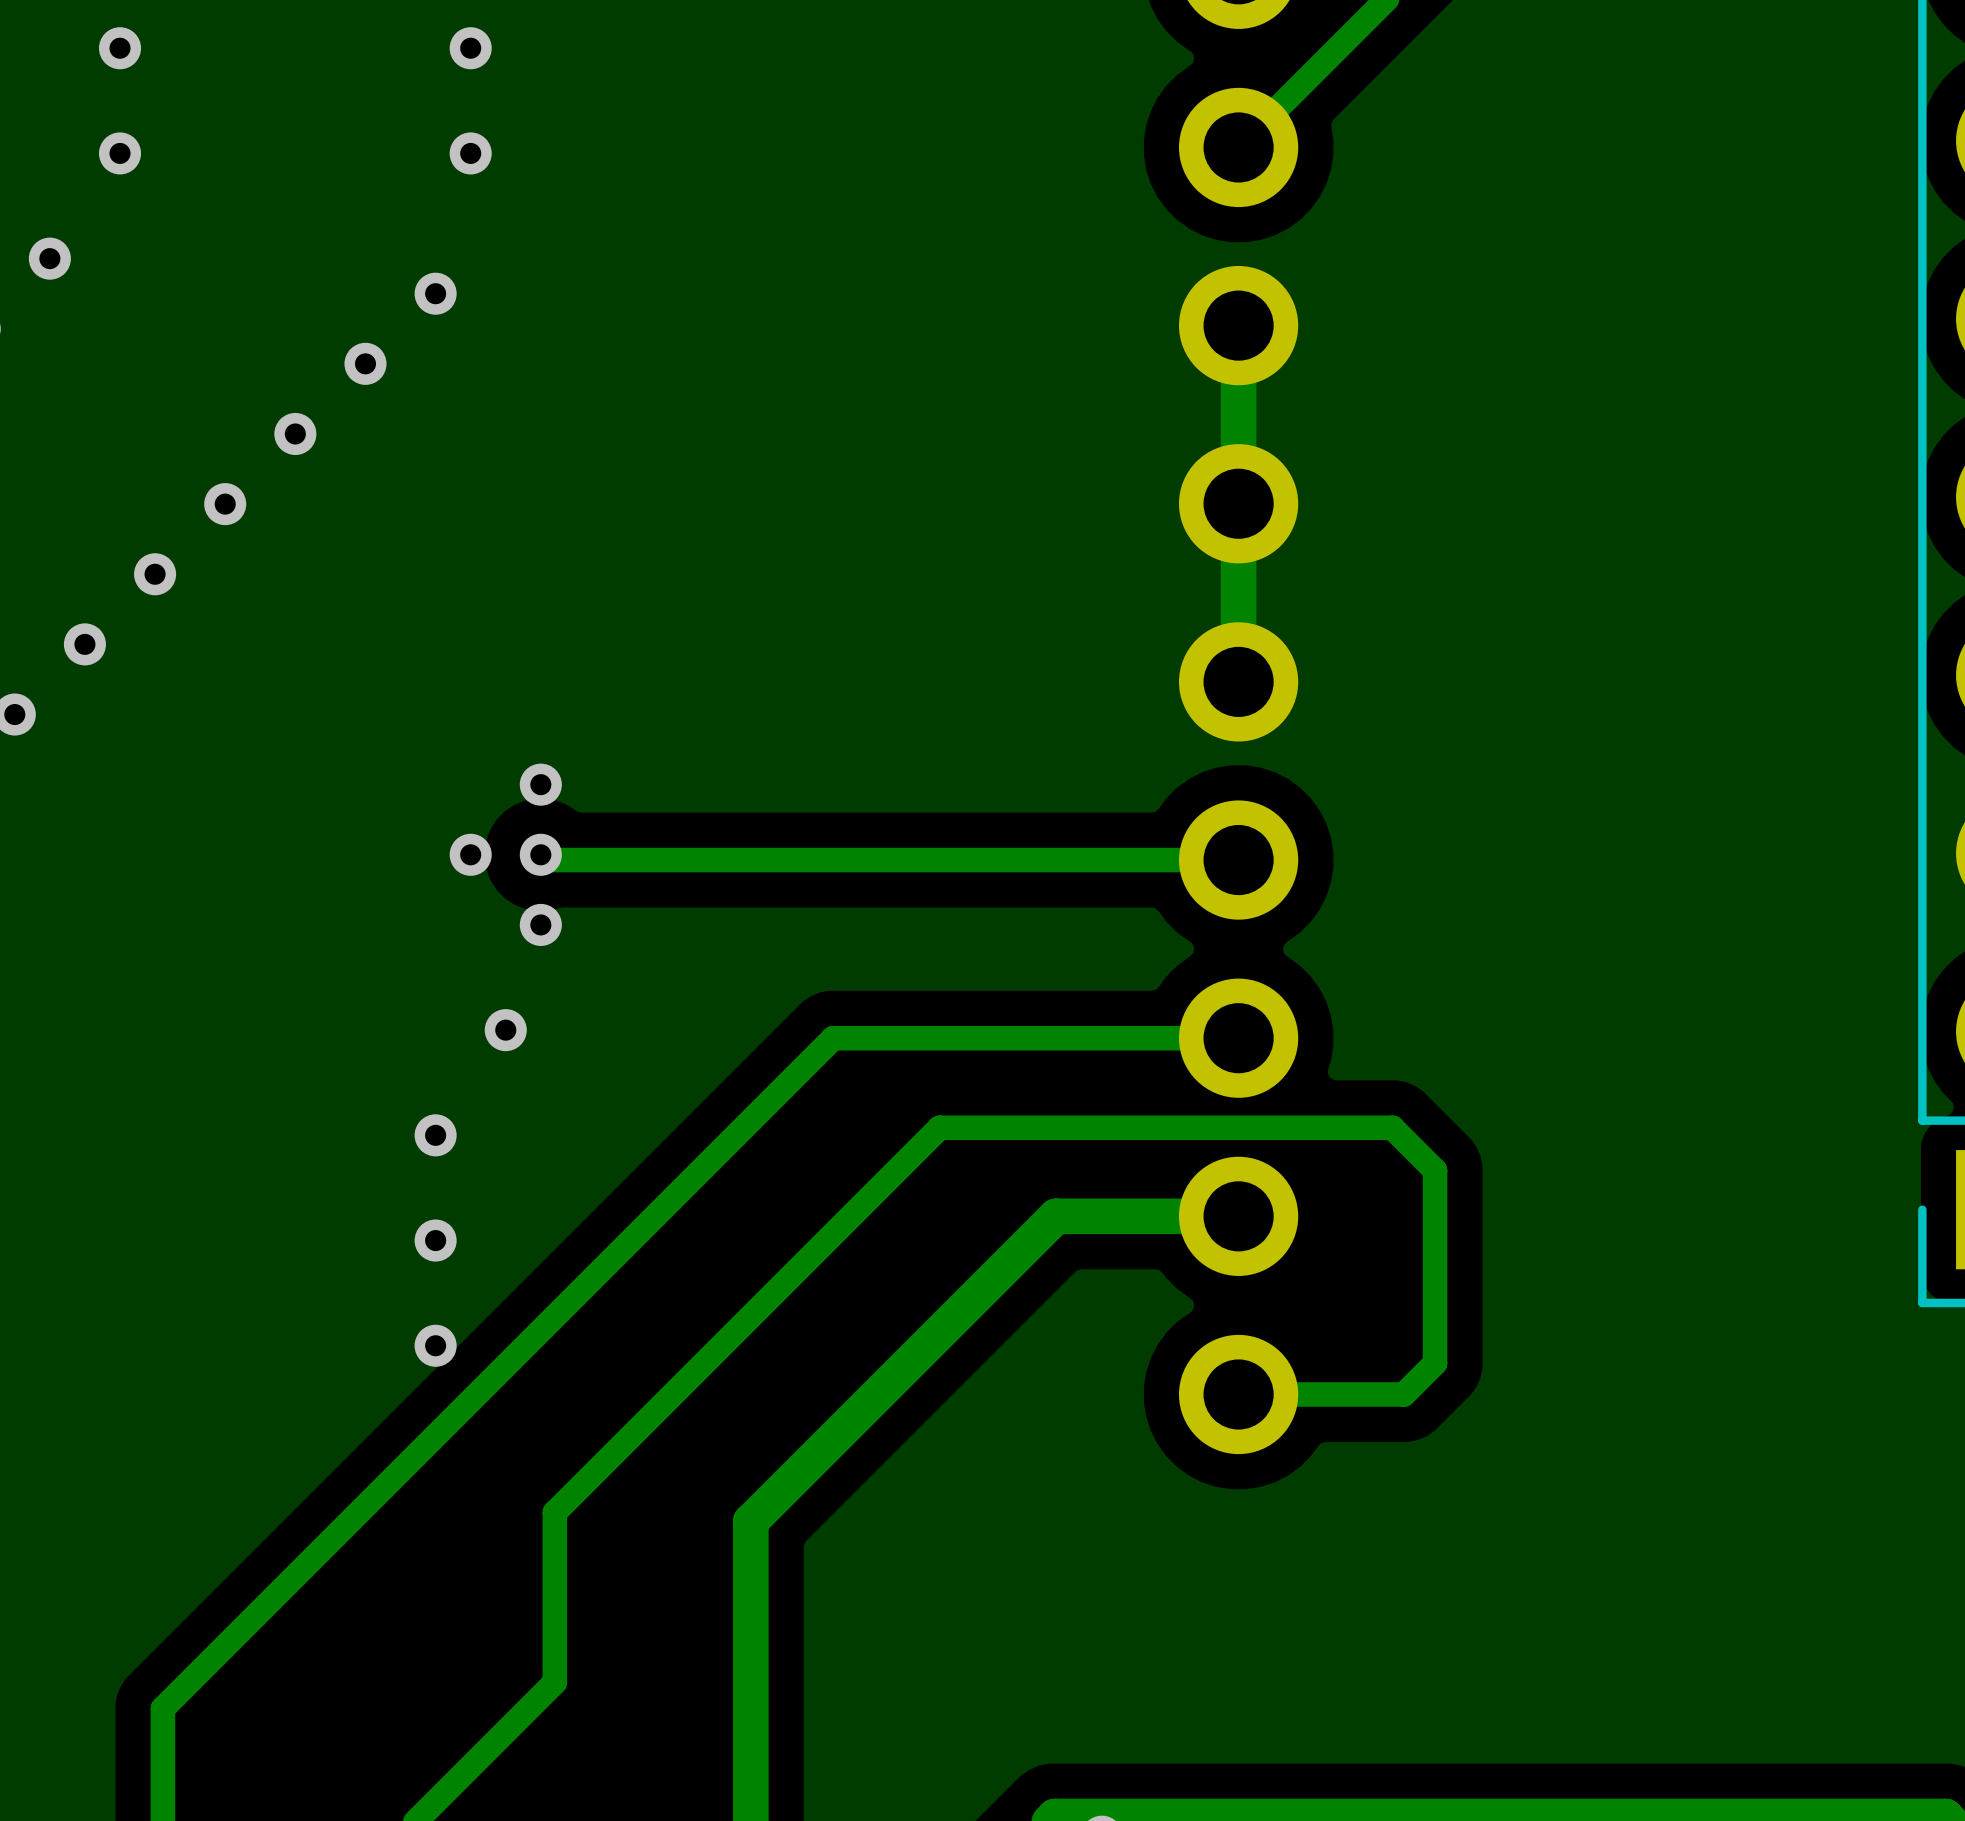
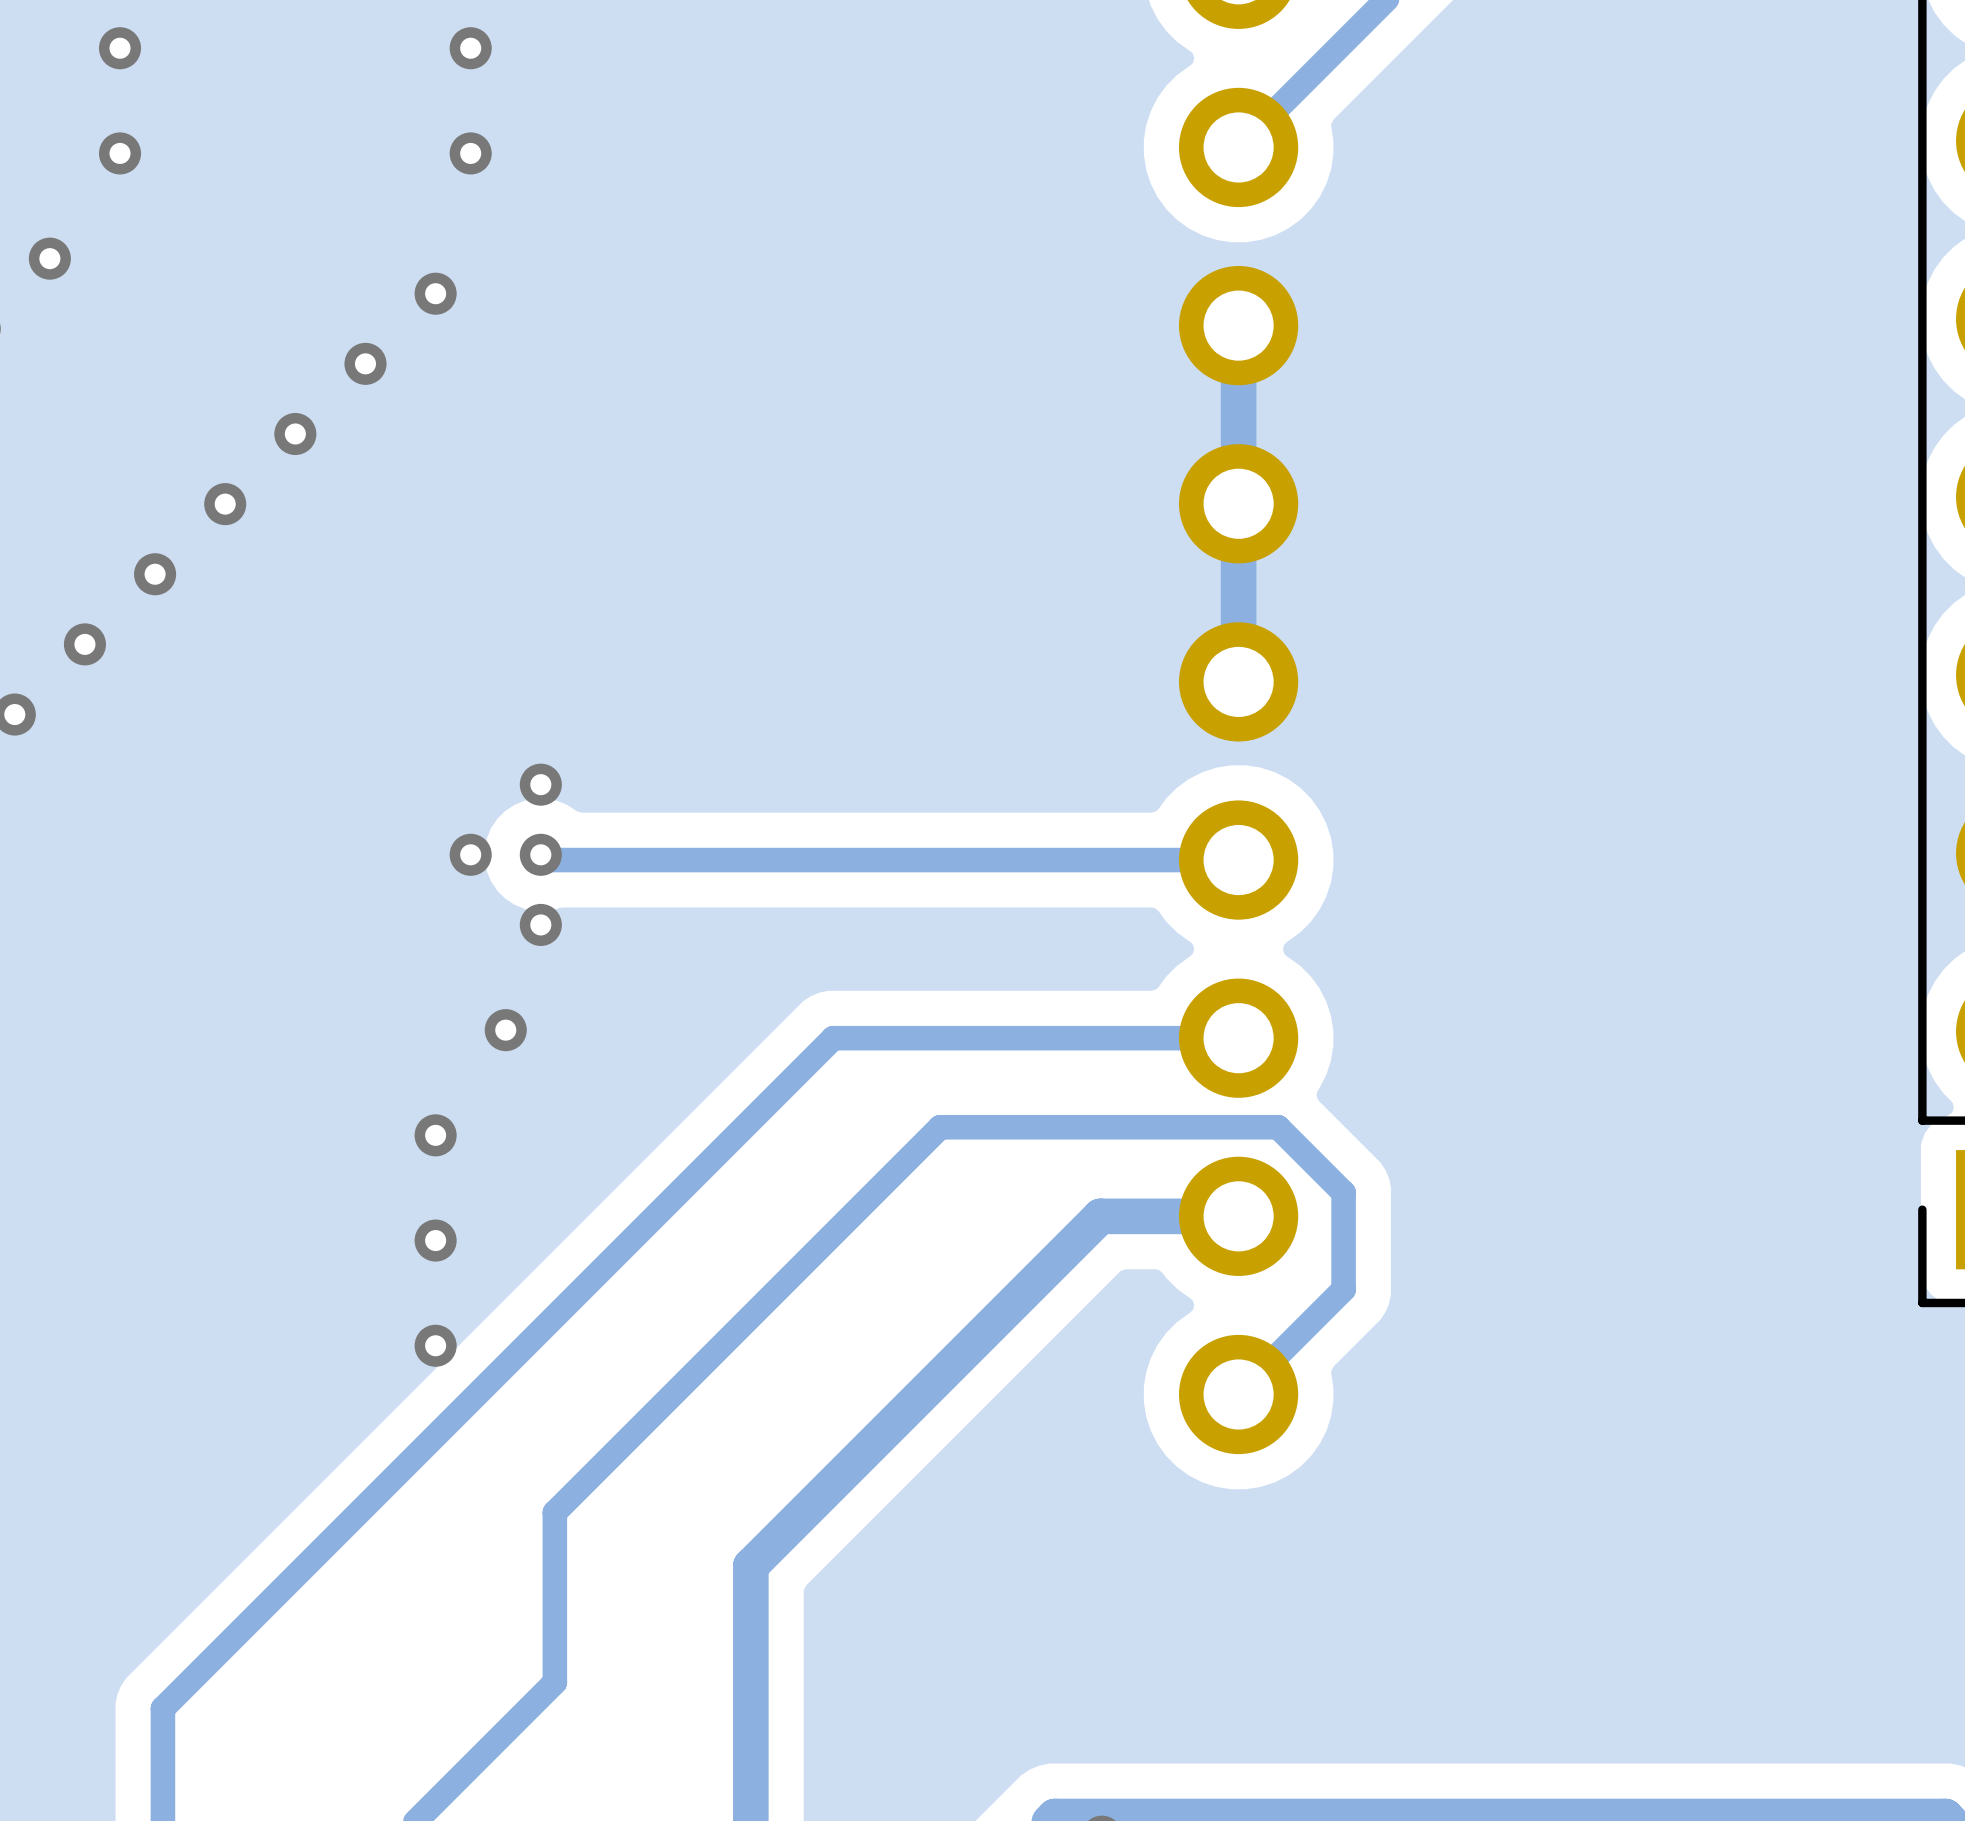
track: (939, 1127) (1392, 1127) (1435, 1170) (1435, 1363) (1403, 1394) (1238, 1394) -> (940, 1127) (1278, 1127) (1343, 1192) (1343, 1289) (1238, 1394)
track: (1100, 1216) (1055, 1216) (750, 1521) (750, 1565) -> (1100, 1216) (750, 1565)

